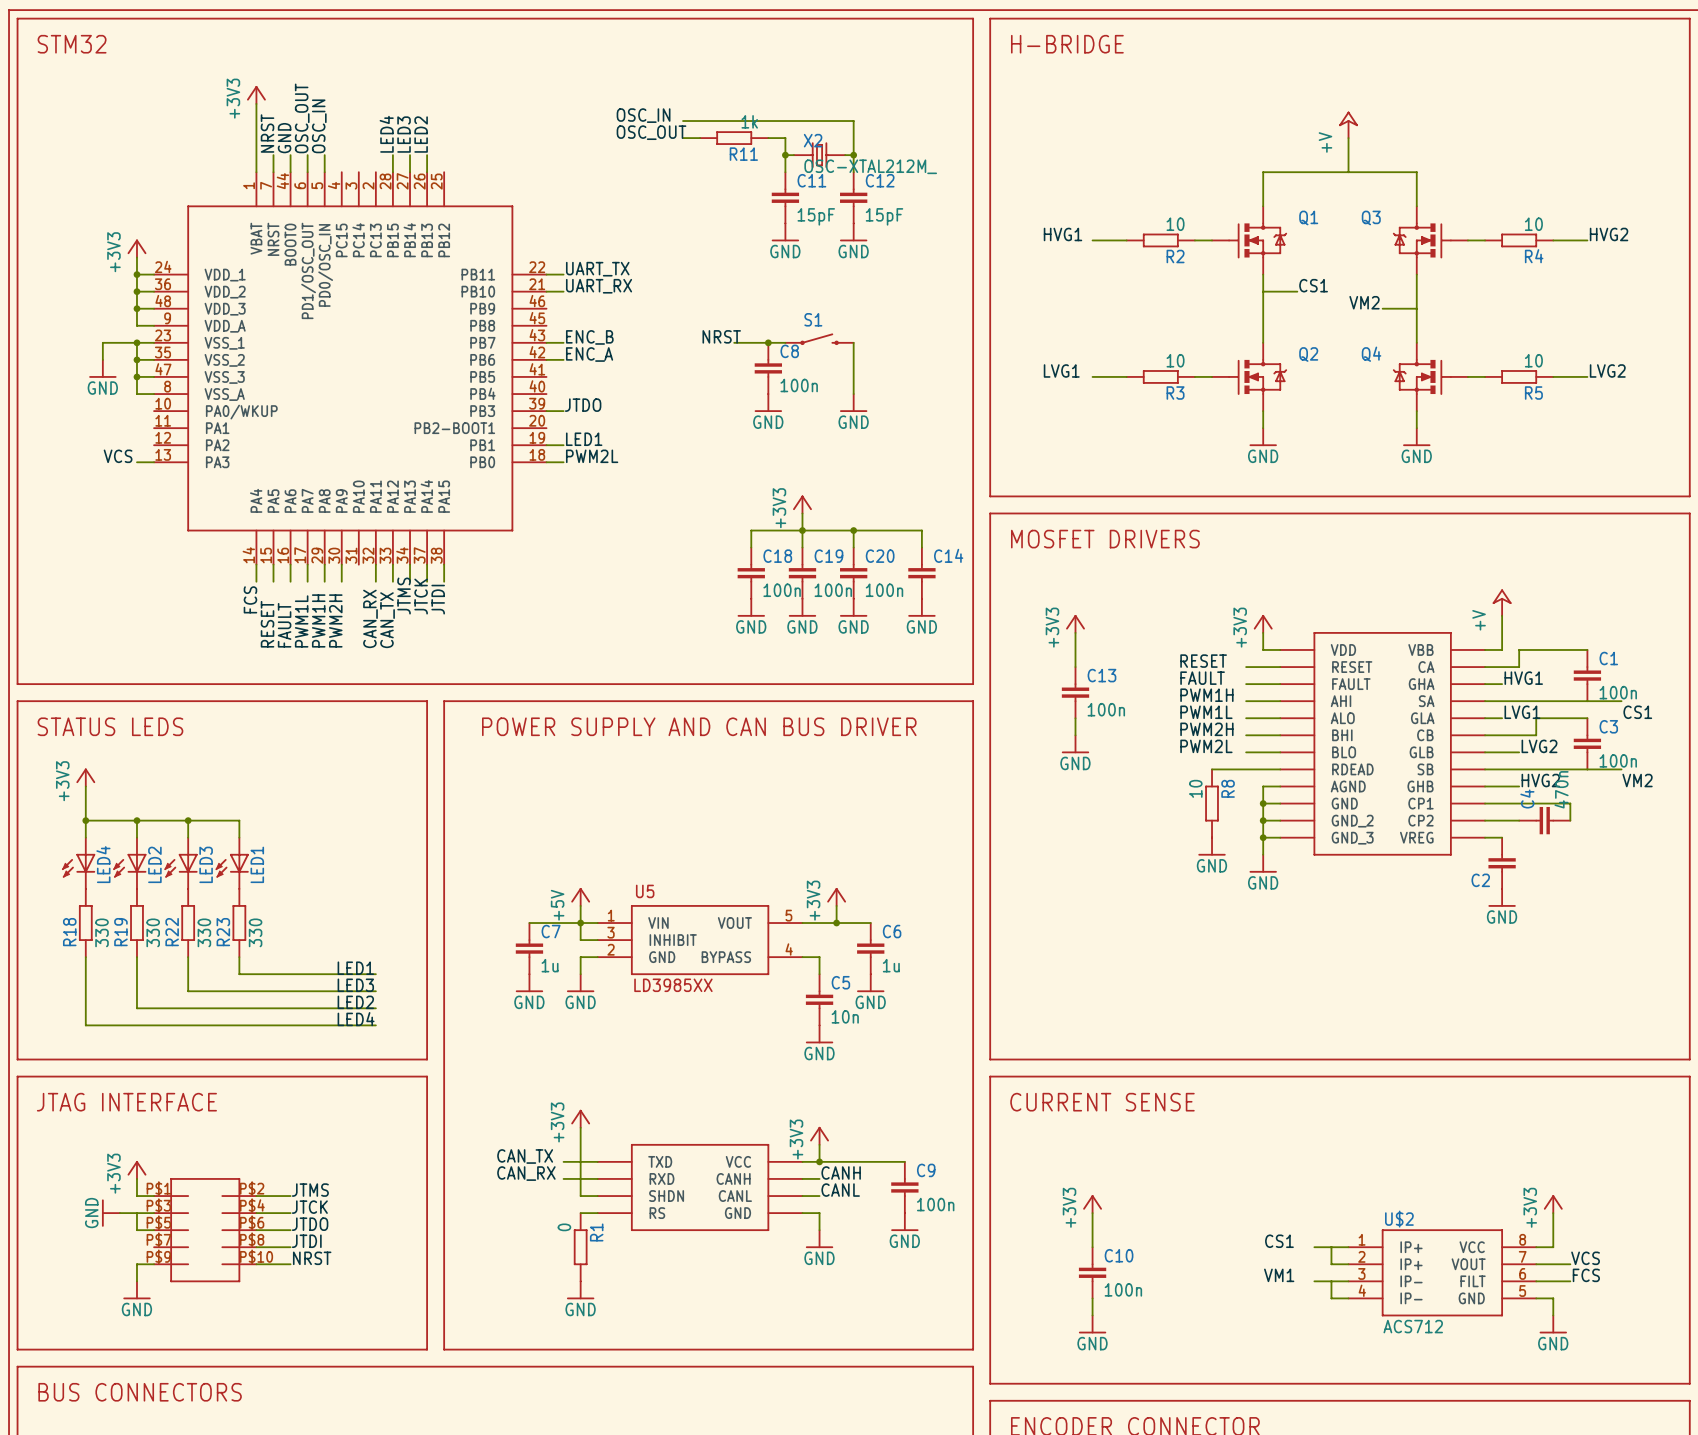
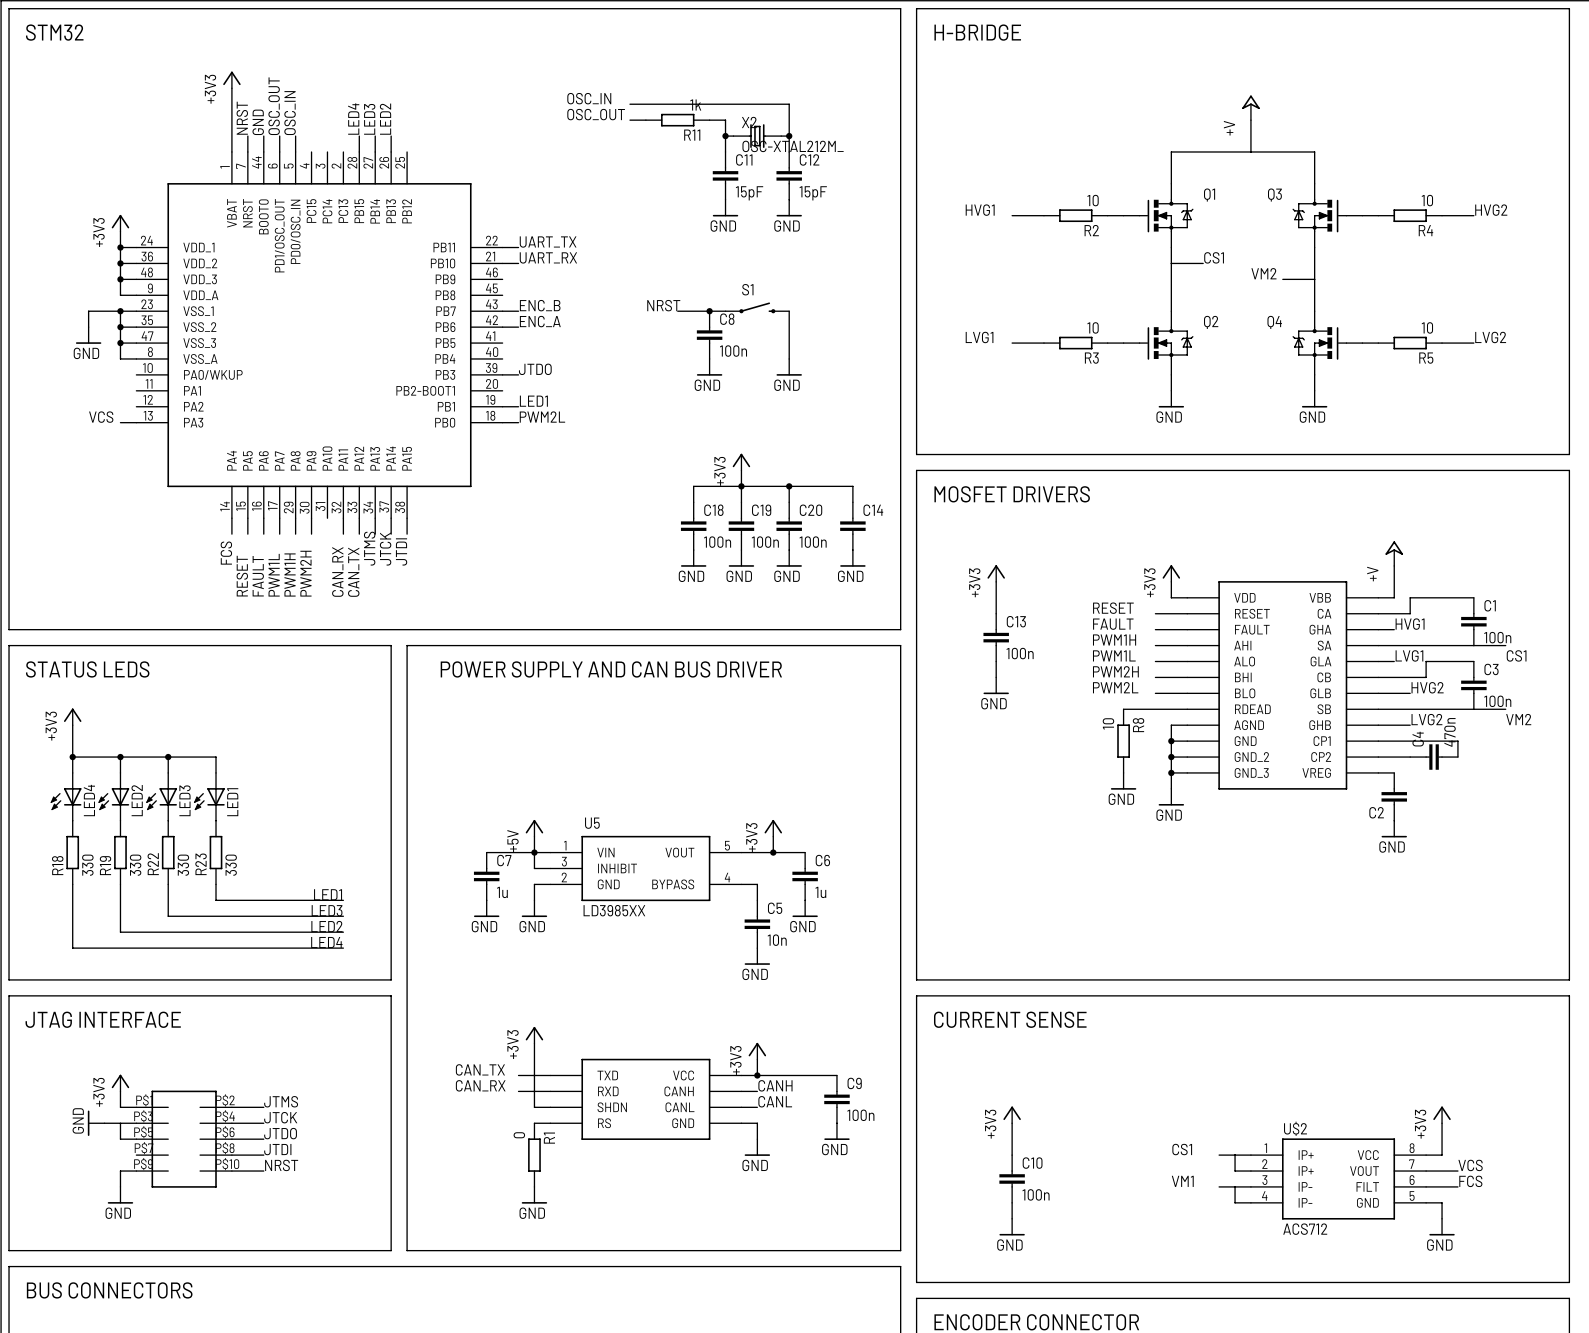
label: LVG2 (1539, 746) -> HVG2 (1427, 687)
label: HVG2 (1540, 780) -> LVG2 (1426, 719)

